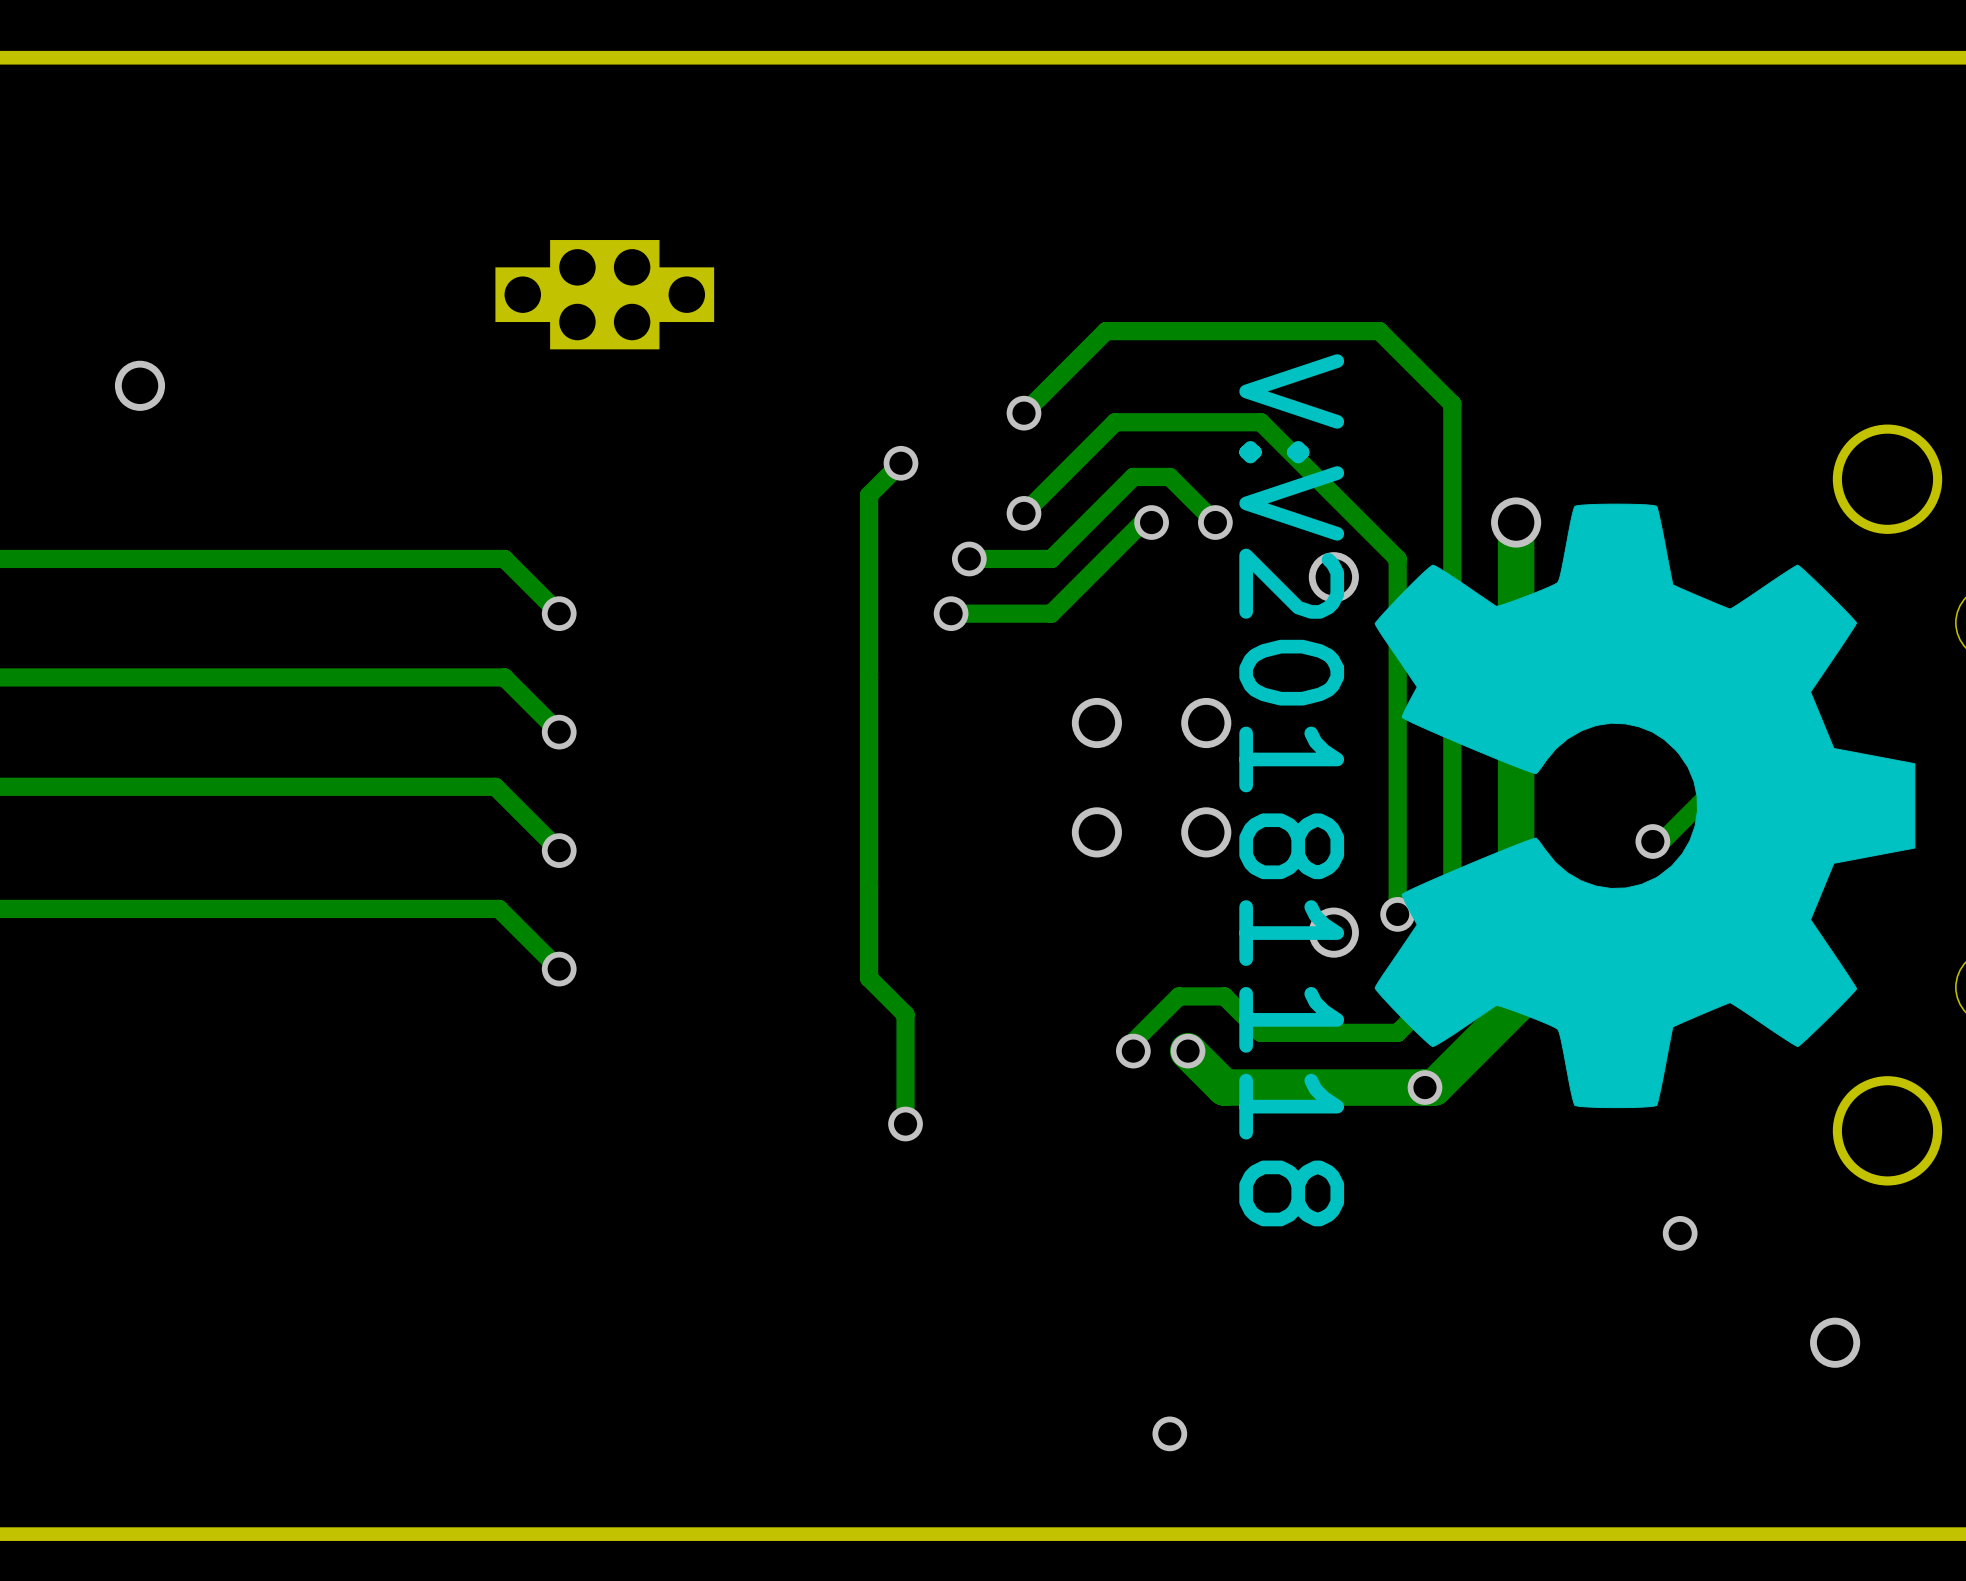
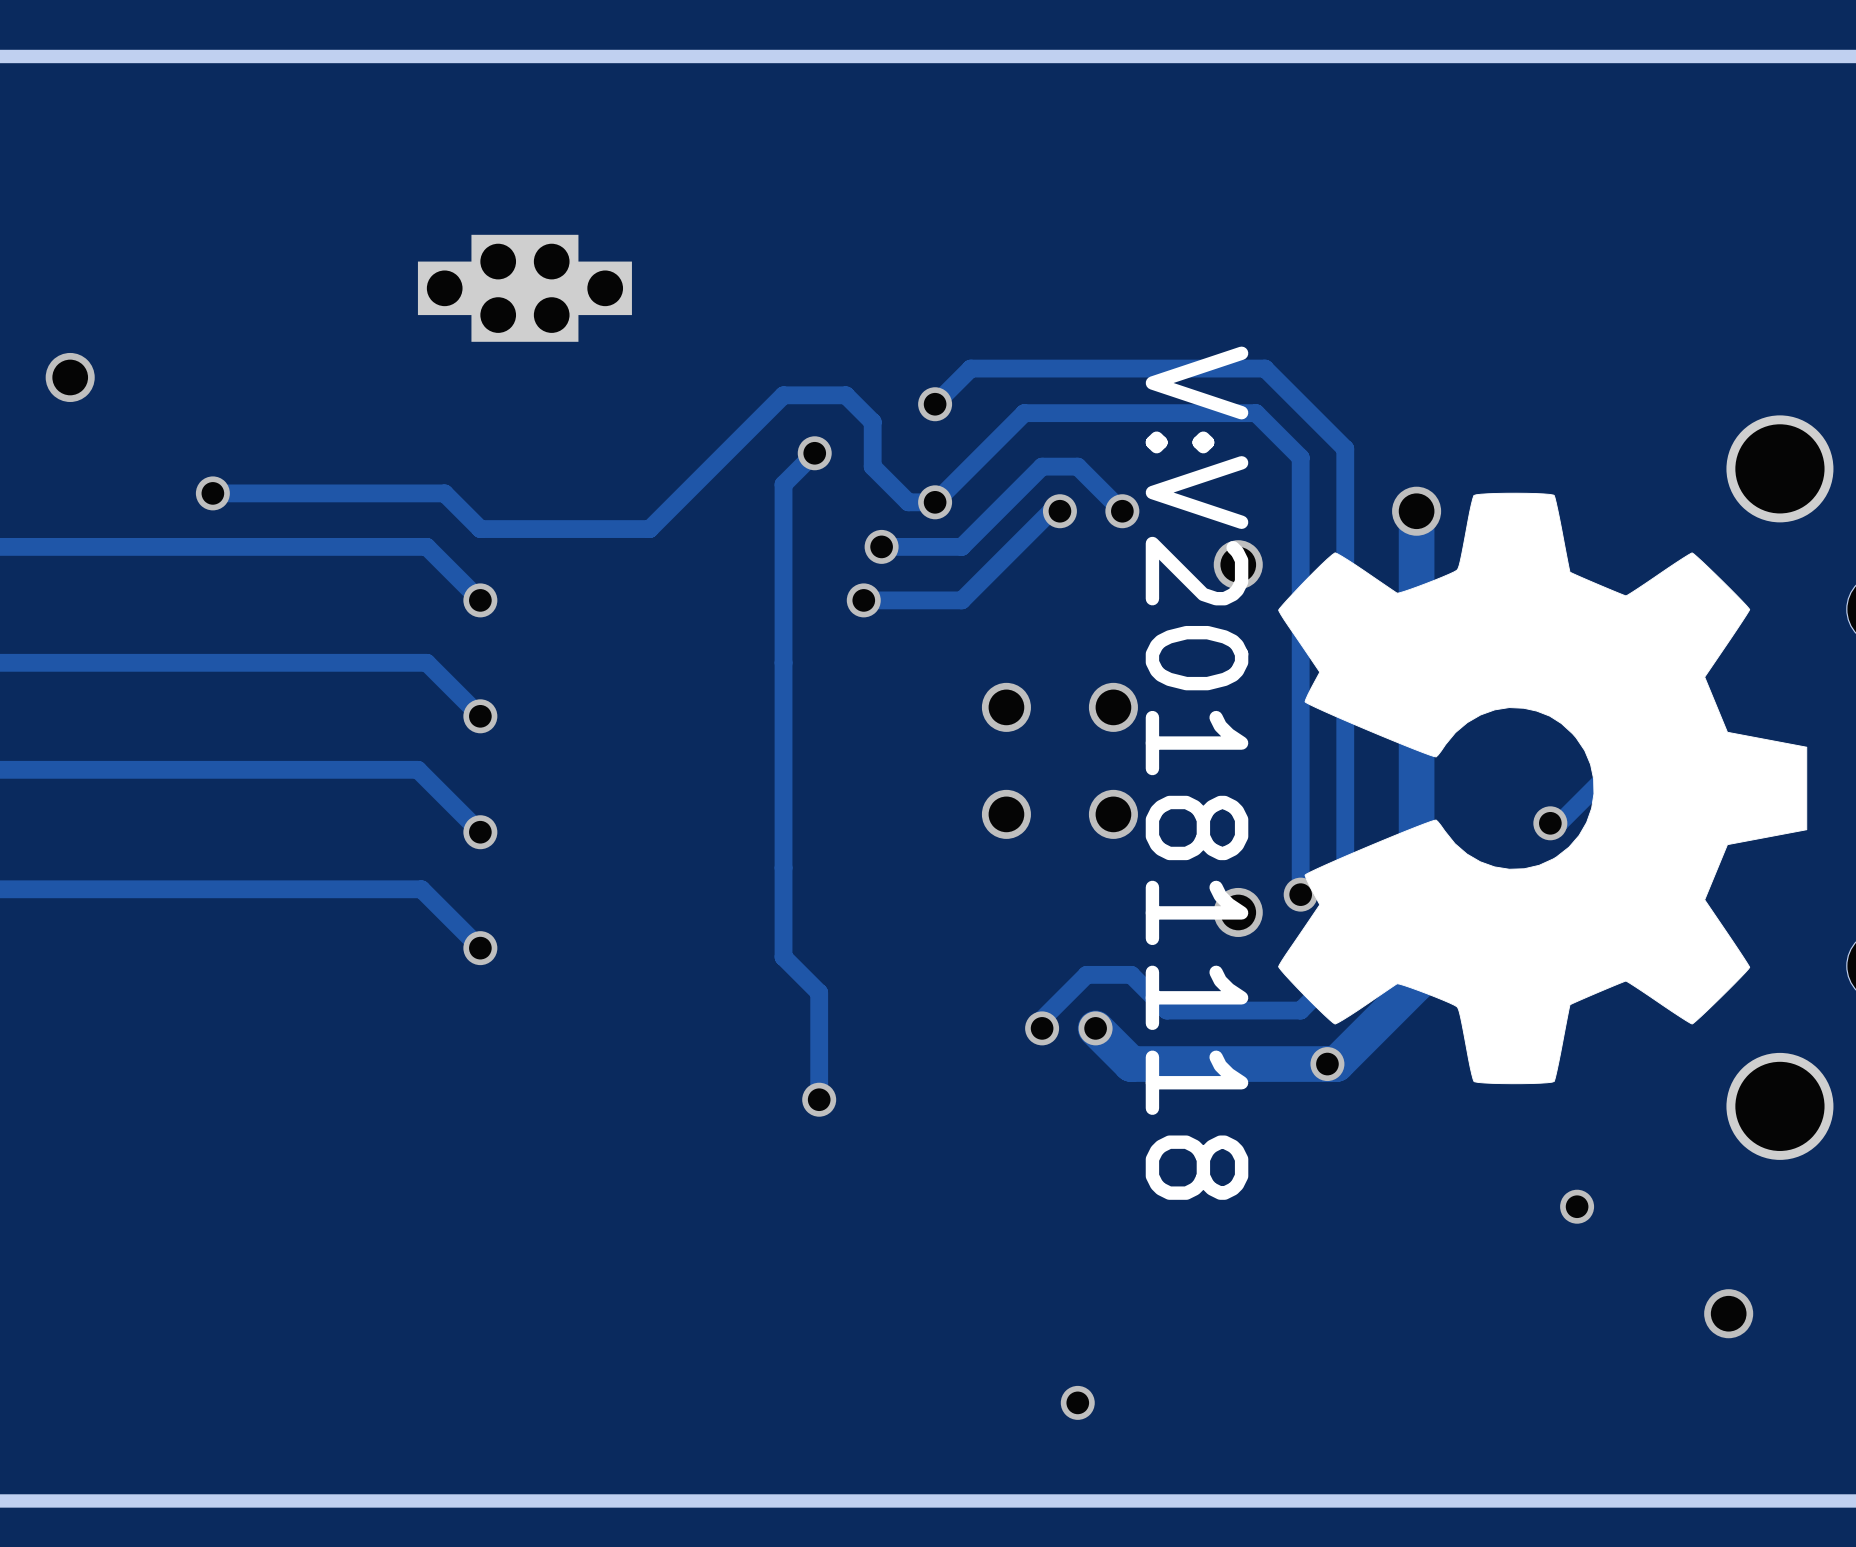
track: (1060, 376) (1106, 331) (1379, 331) (1452, 404) (1452, 978) (1443, 987) -> (970, 368) (1265, 368) (1345, 448) (1345, 618) (1354, 627) (1345, 636) (1345, 965)
track: (1260, 422) (1397, 558) -> (1166, 413) (1256, 413) (1300, 457) (1300, 546)
track: none -> (212, 493) (444, 493) (480, 529) (649, 529) (783, 395) (845, 395) (872, 422) (872, 466) (908, 502) (935, 502)
via: none -> (212, 493)

